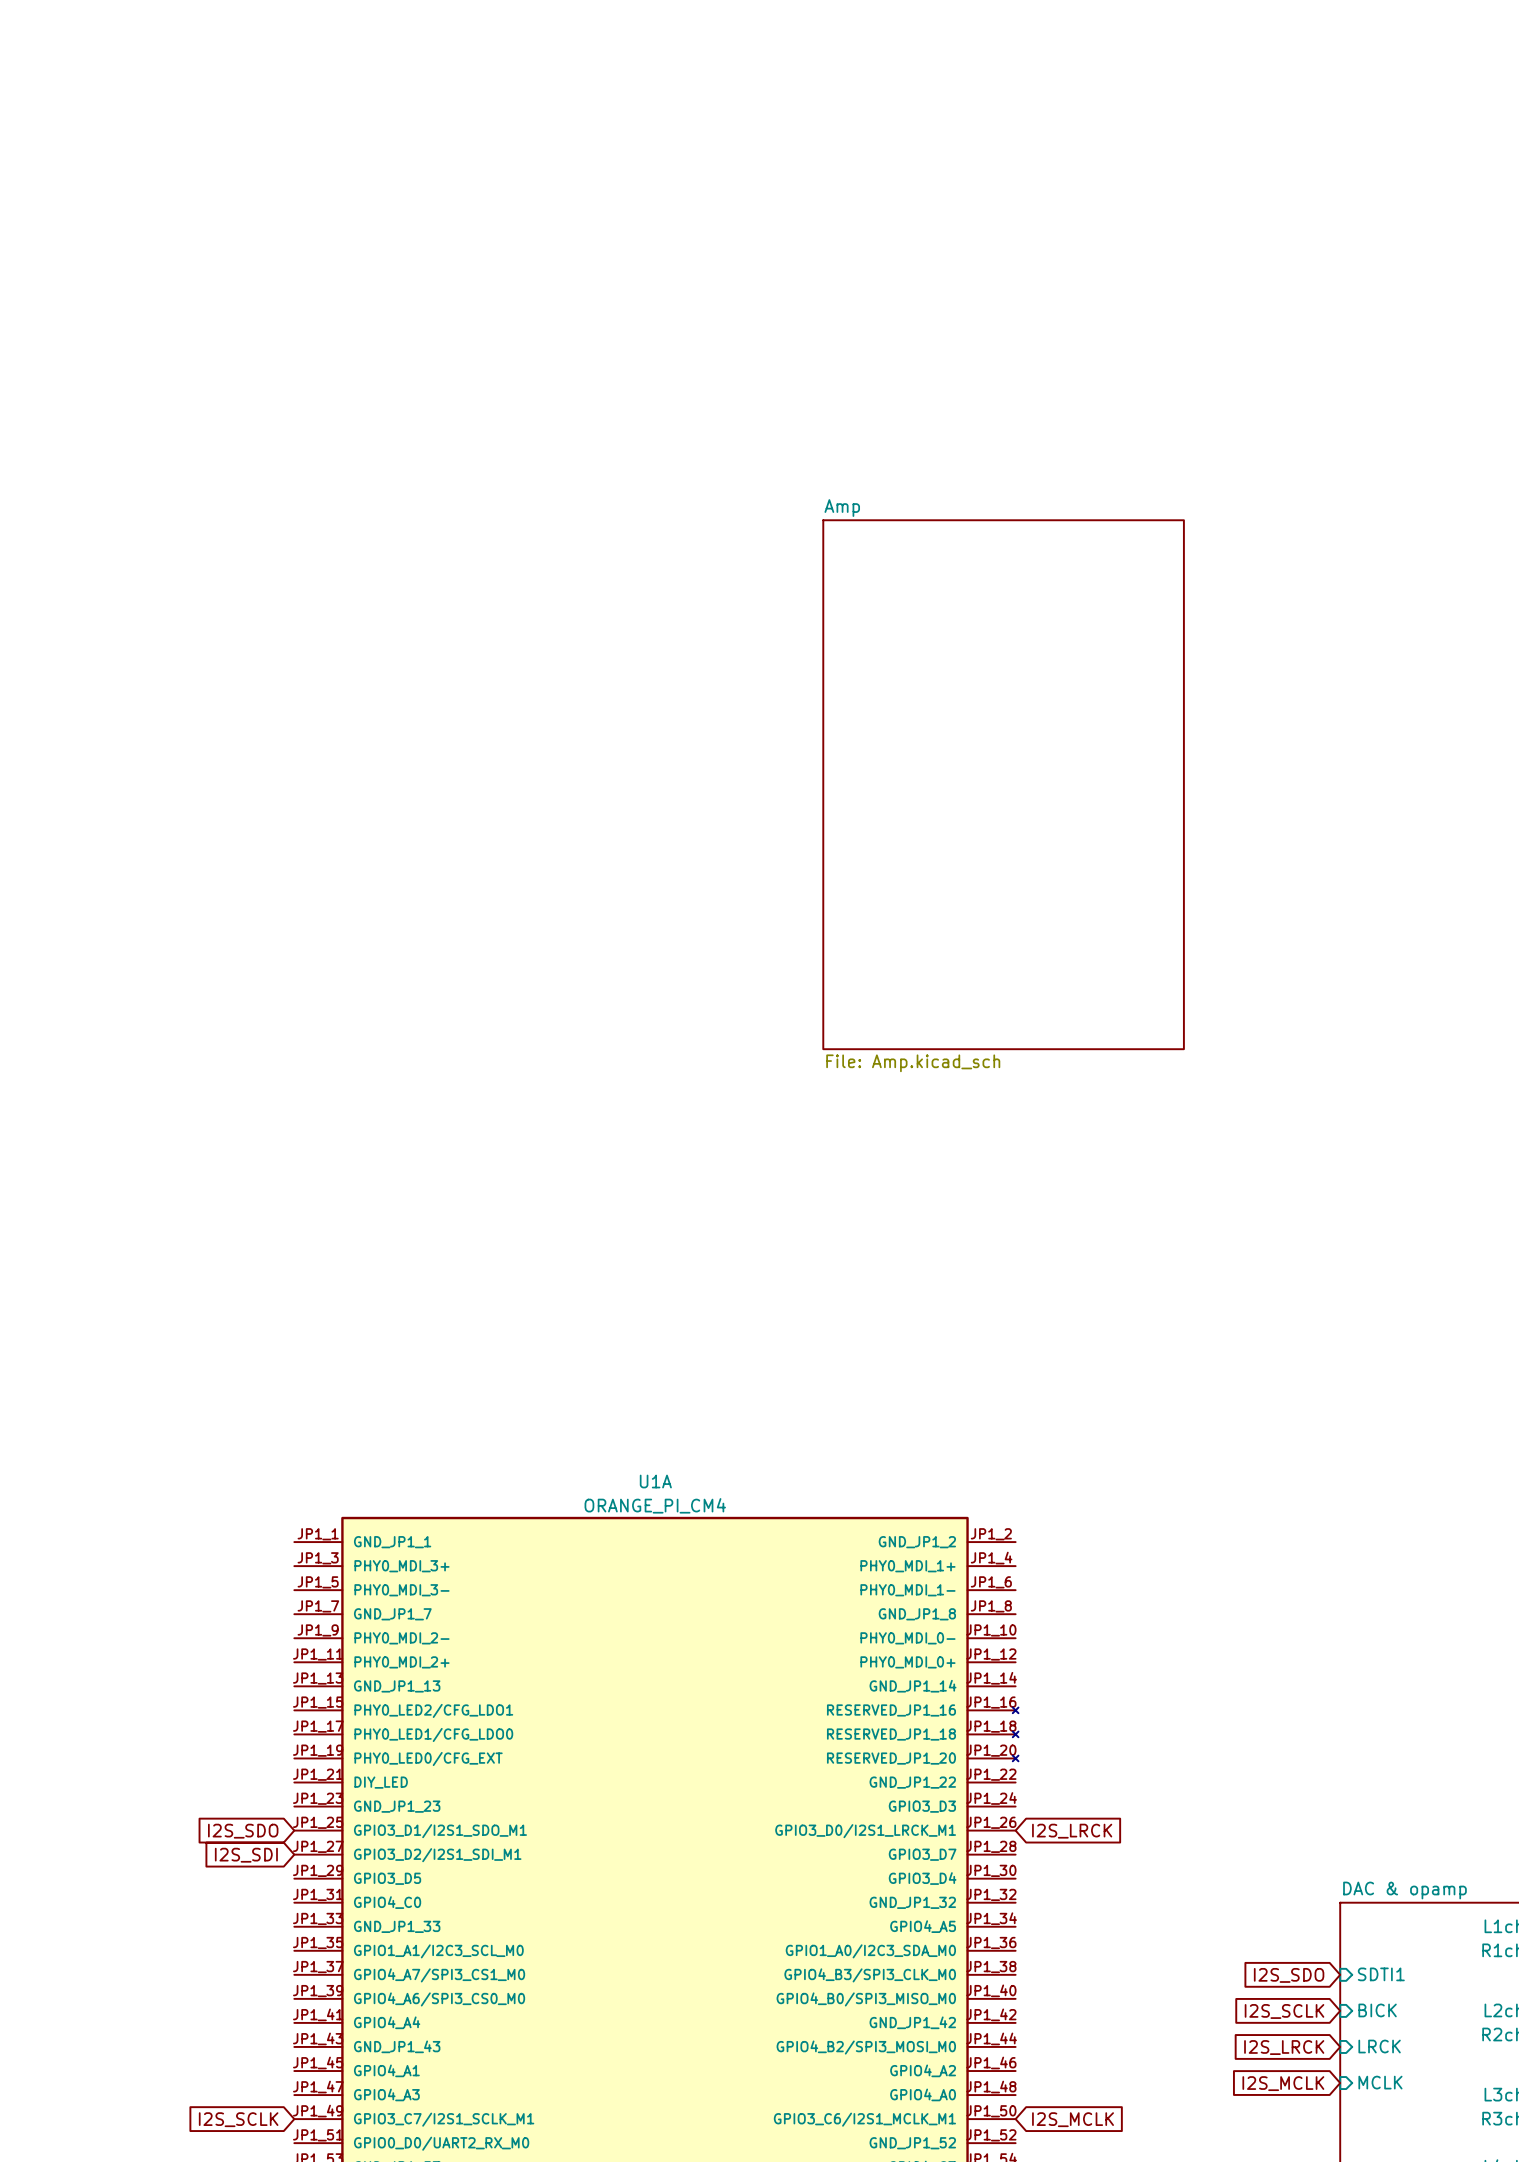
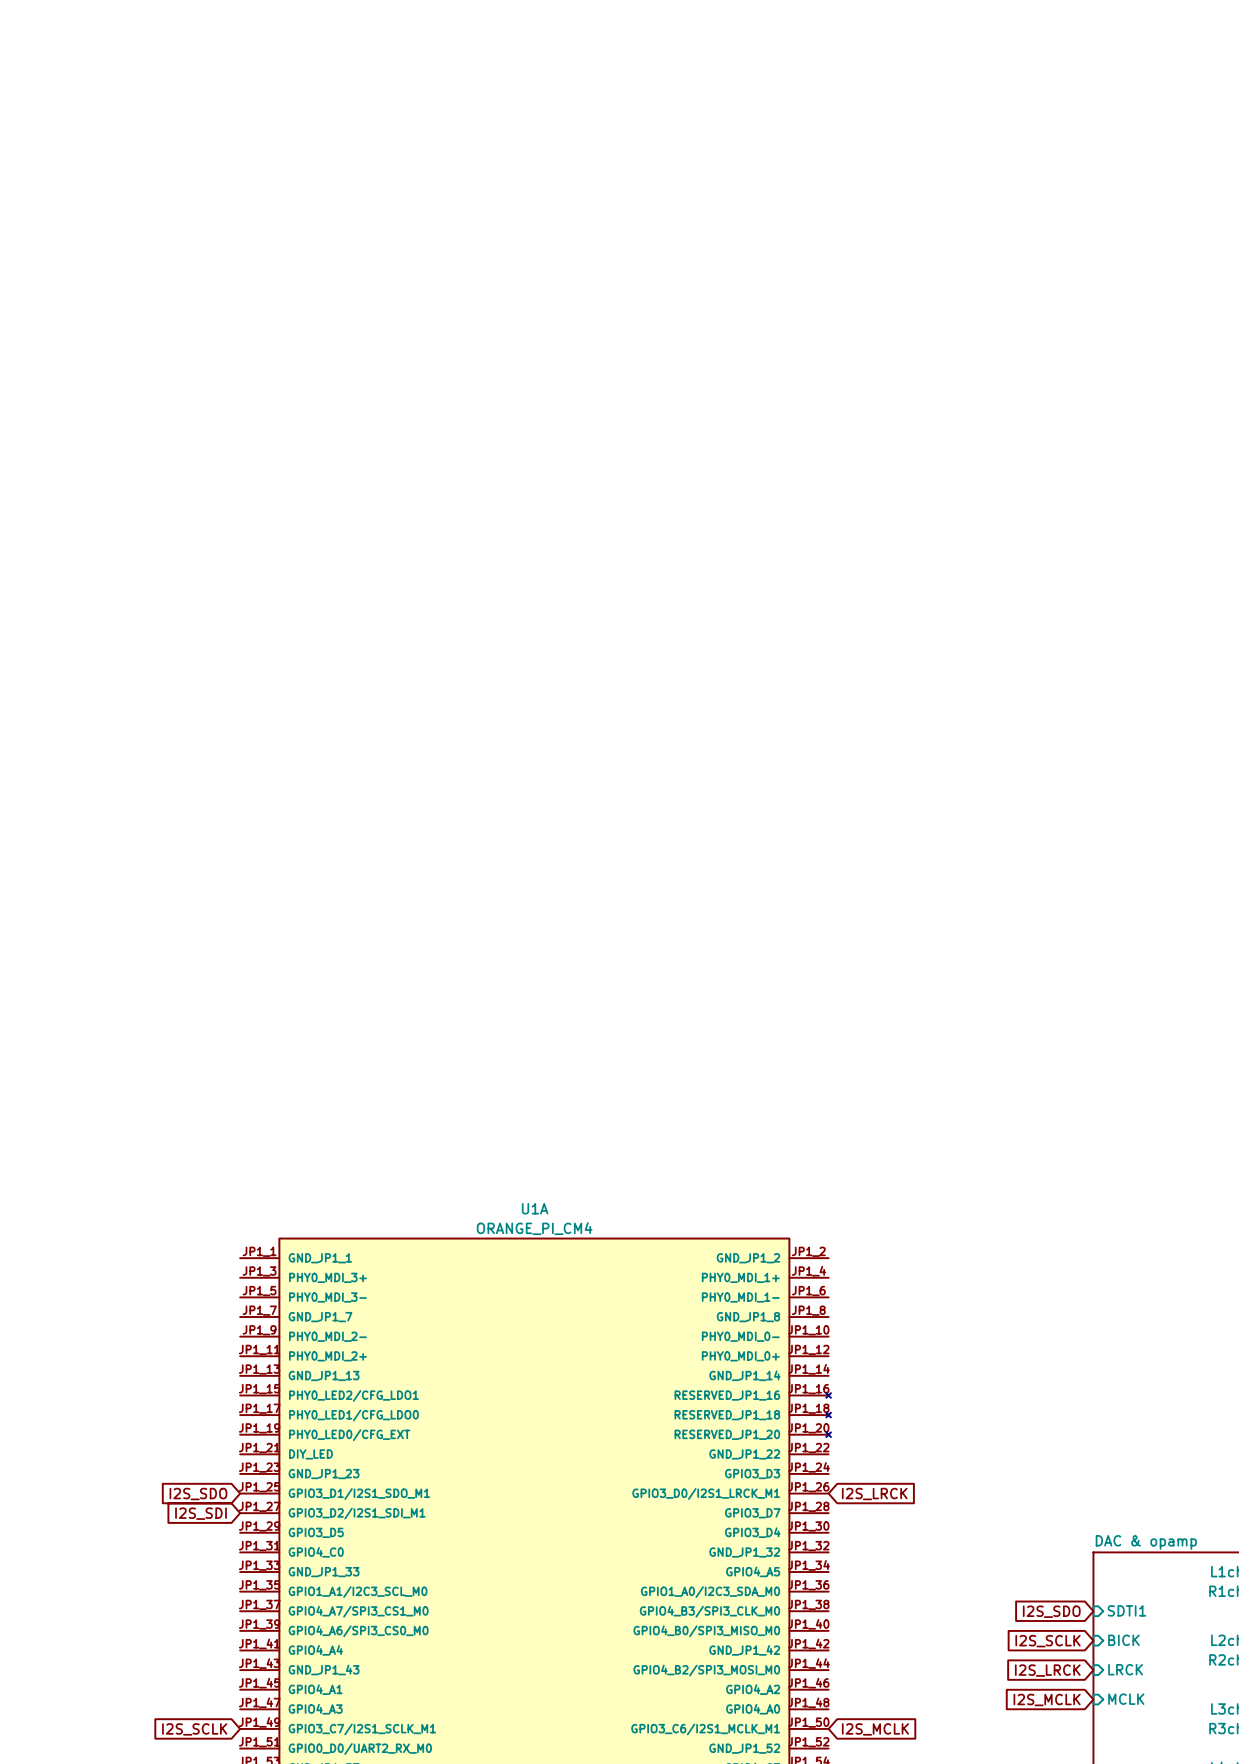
sheet Amp: File: Amp.kicad_sch (1003, 784) -> none

